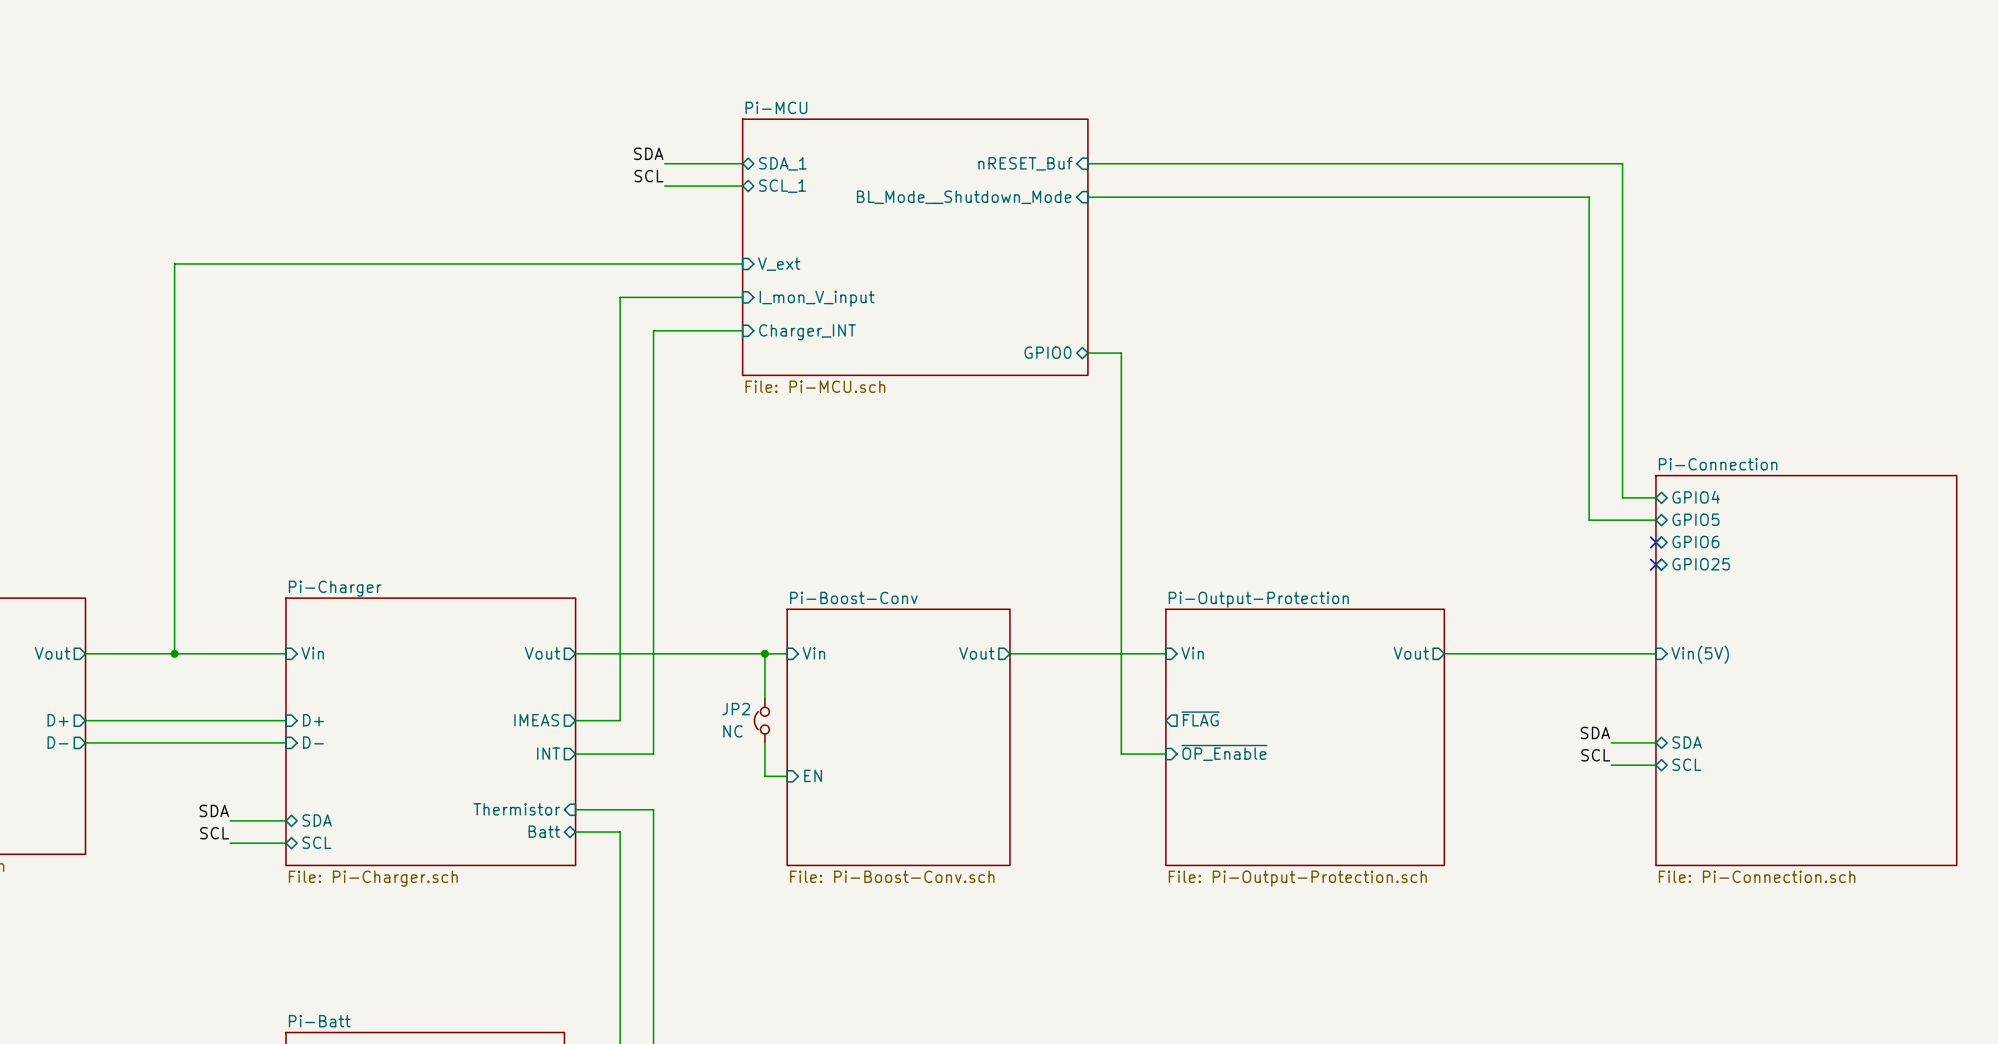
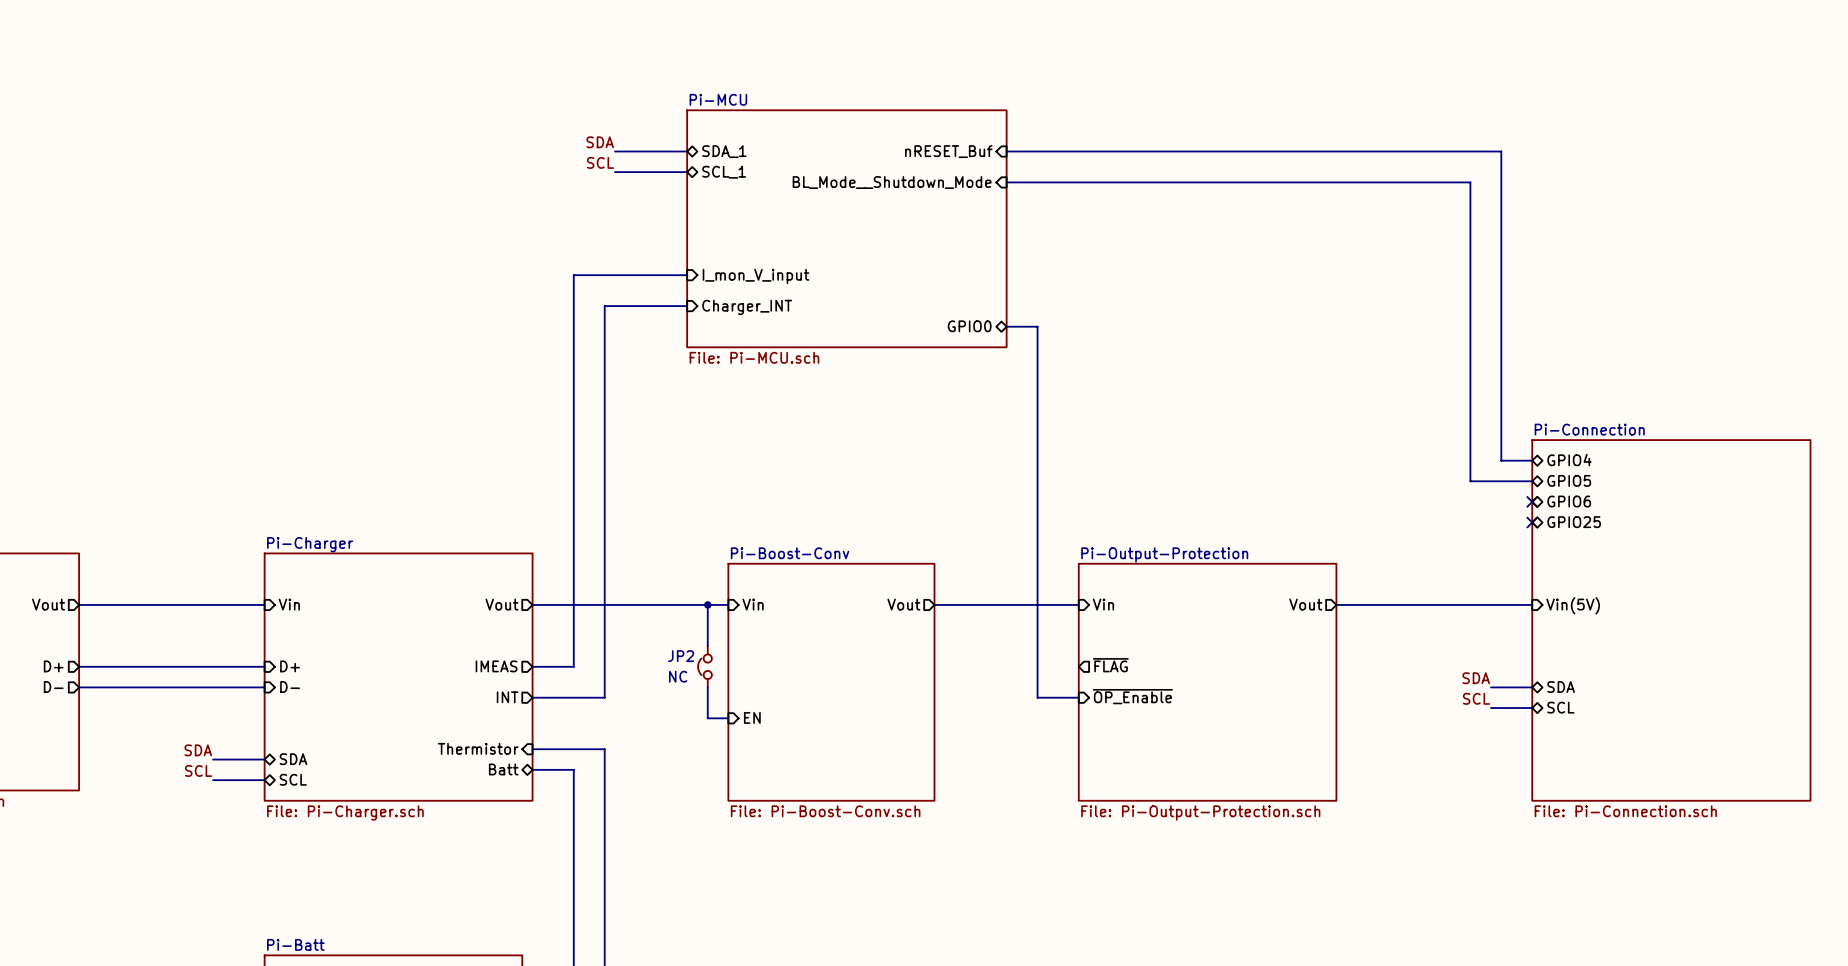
wire: (742, 263) (174, 263) (174, 653) -> none
sheet pin: V_ext (779, 264) -> none
junction: (174, 653) -> none

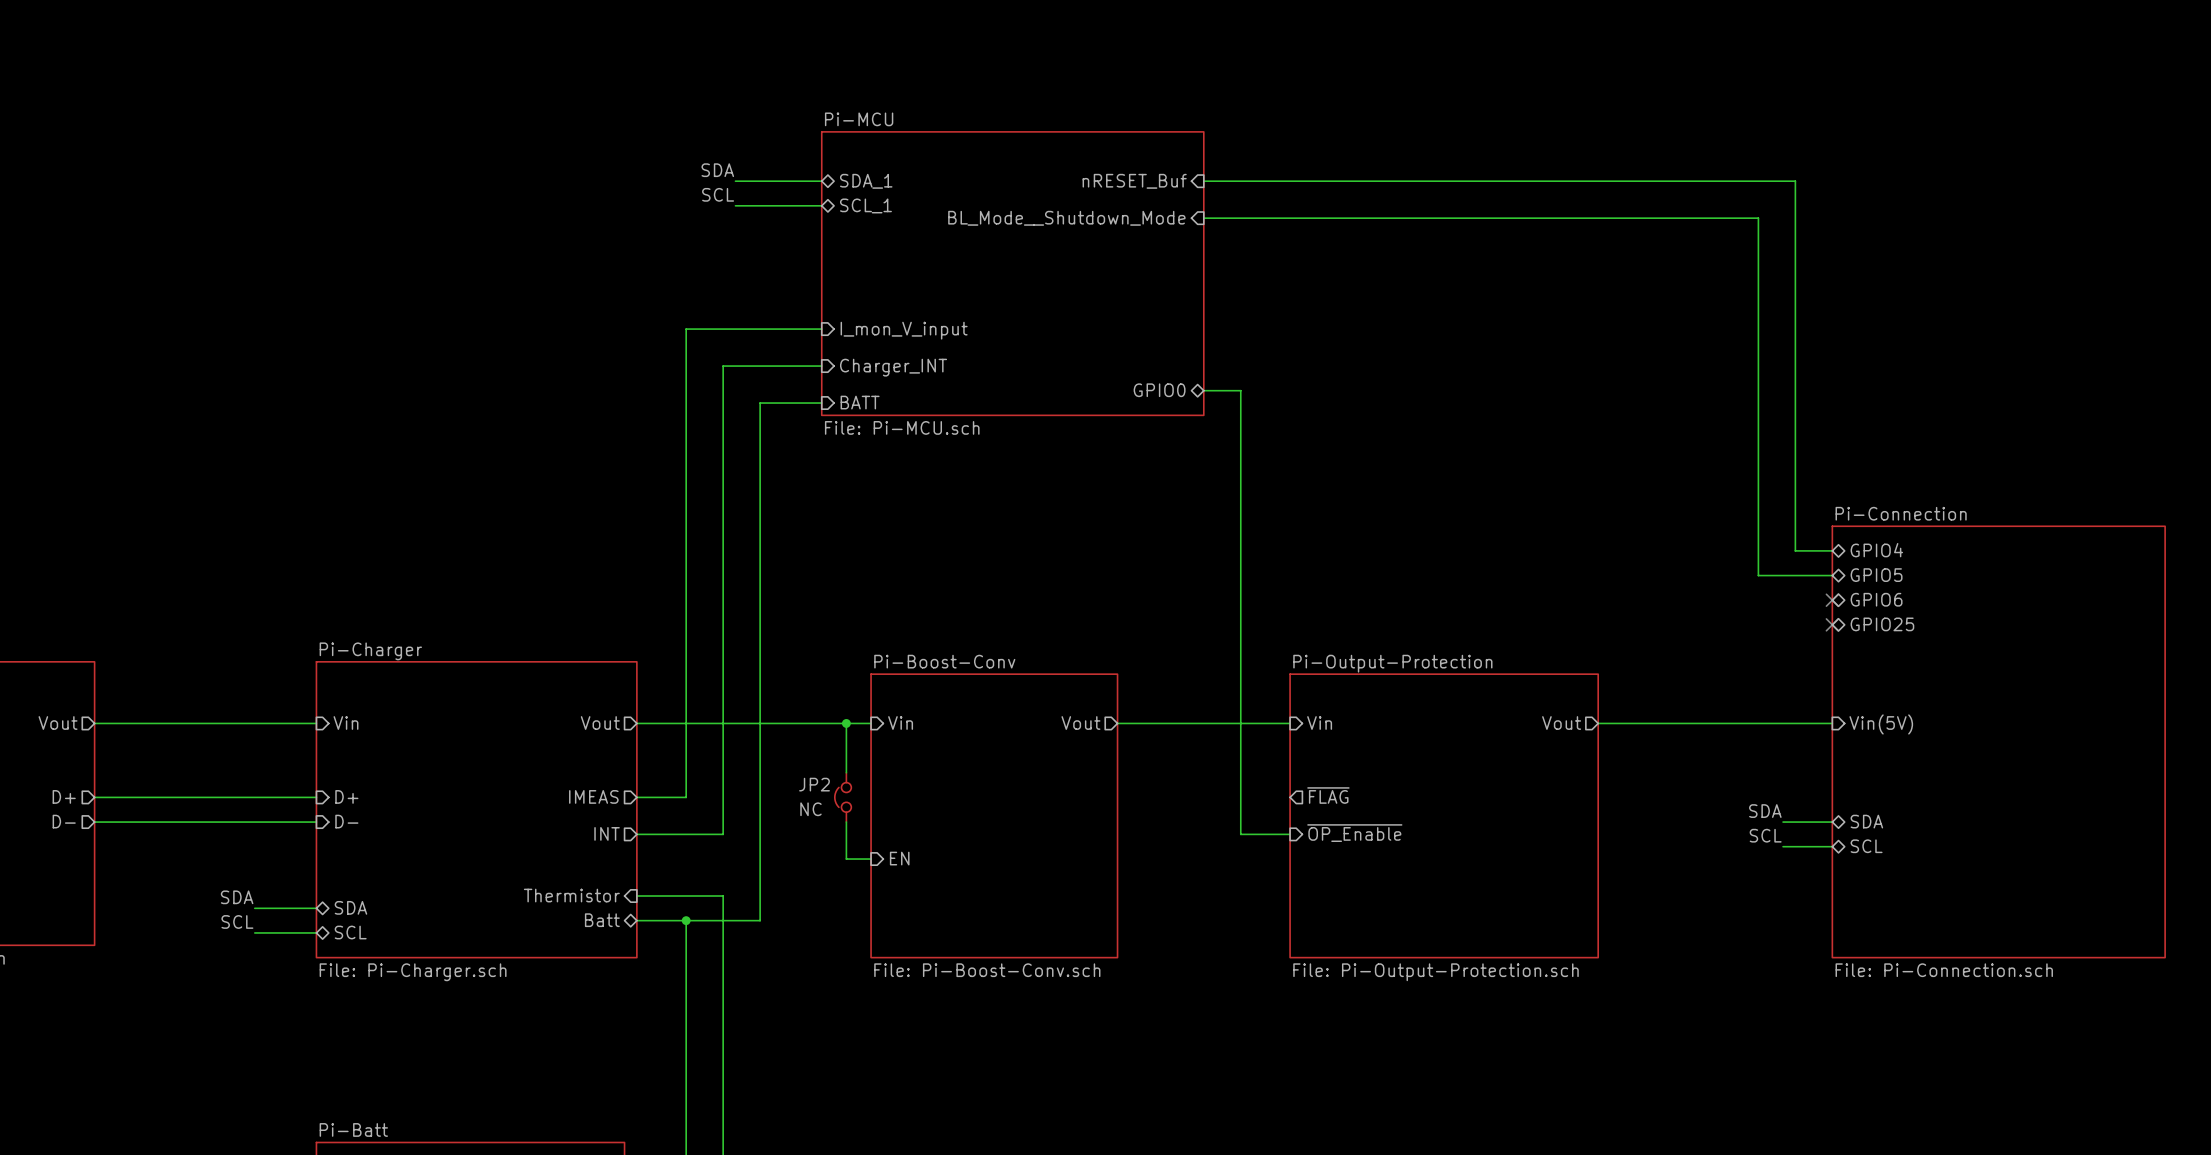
sheet pin: none -> BATT (860, 402)
wire: none -> (821, 403) (760, 403) (760, 920) (686, 920)
junction: none -> (686, 920)

